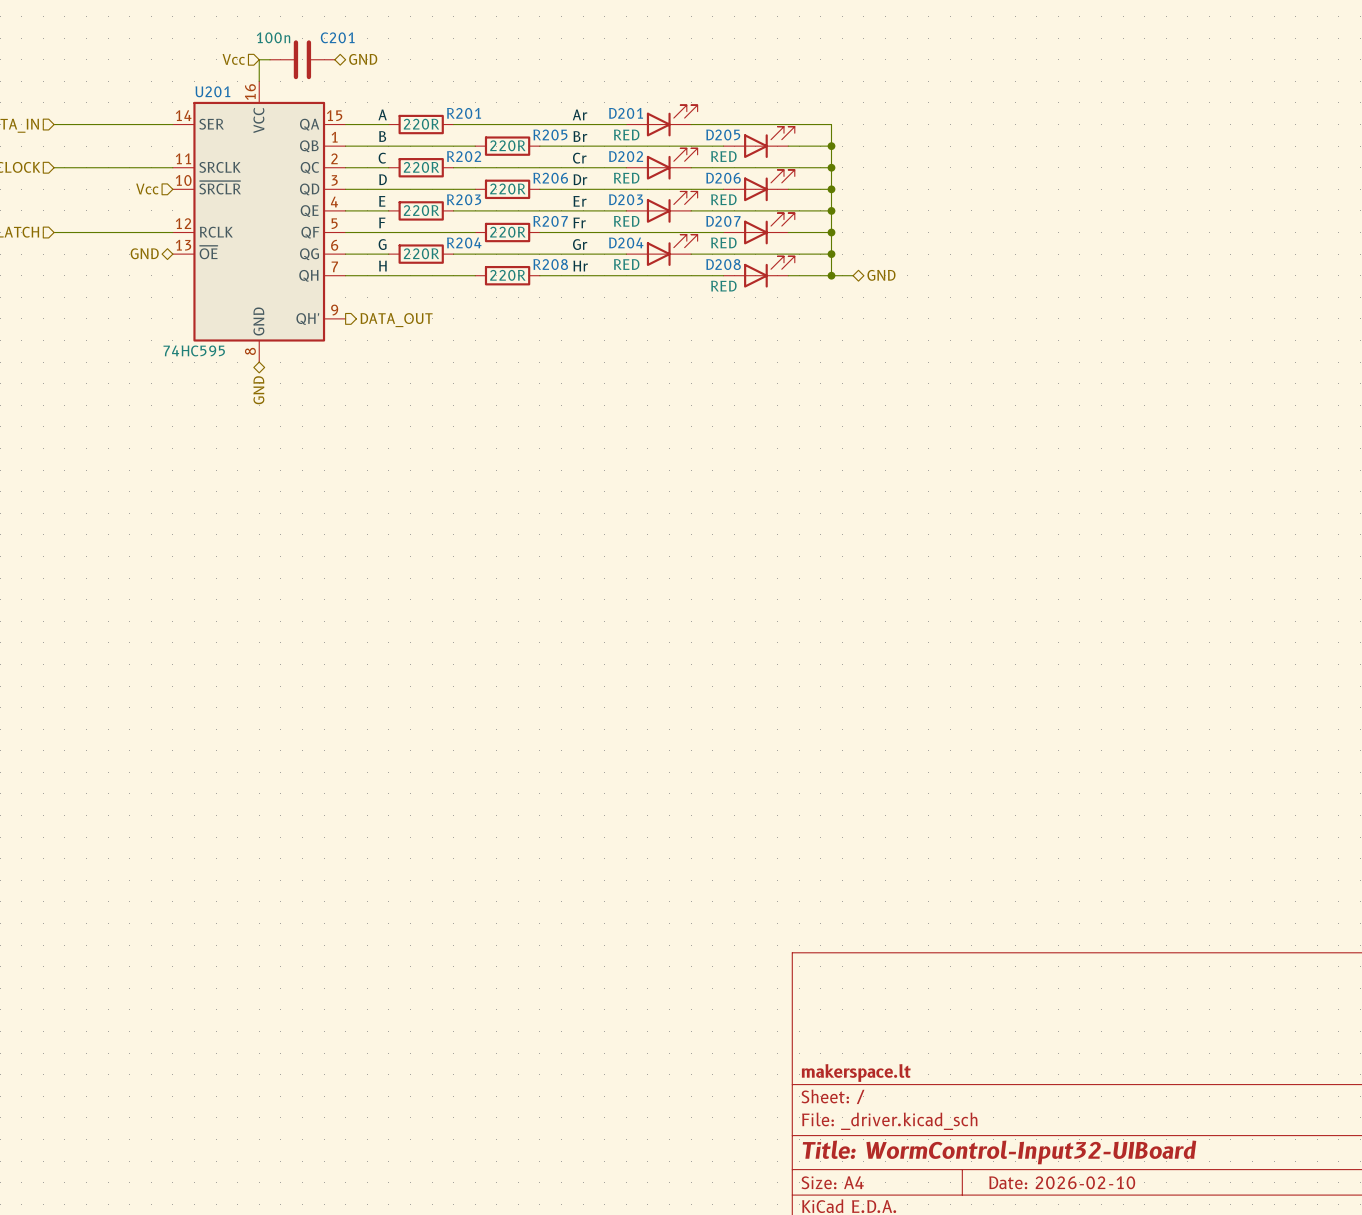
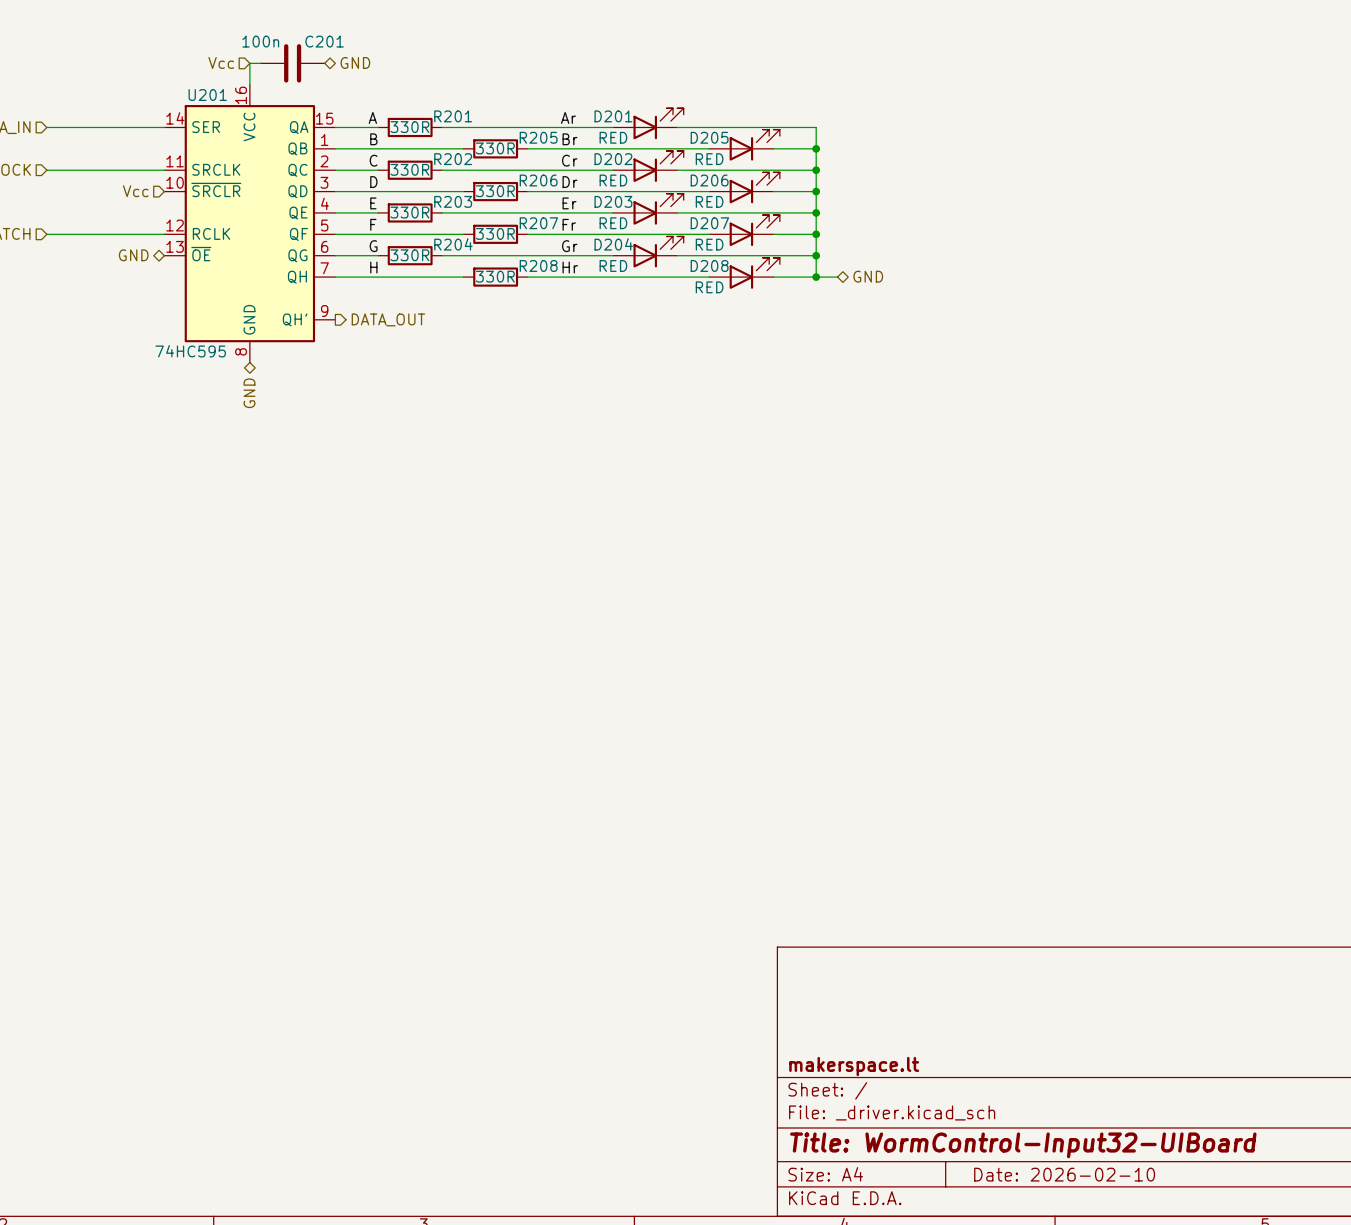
R201 value: 220R (421, 124) -> 330R (409, 127)
R205 value: 220R (507, 145) -> 330R (495, 148)
R202 value: 220R (421, 167) -> 330R (409, 169)
R206 value: 220R (507, 188) -> 330R (495, 191)
R203 value: 220R (421, 210) -> 330R (409, 212)
R207 value: 220R (507, 232) -> 330R (495, 233)
R204 value: 220R (421, 253) -> 330R (409, 255)
R208 value: 220R (507, 275) -> 330R (495, 276)

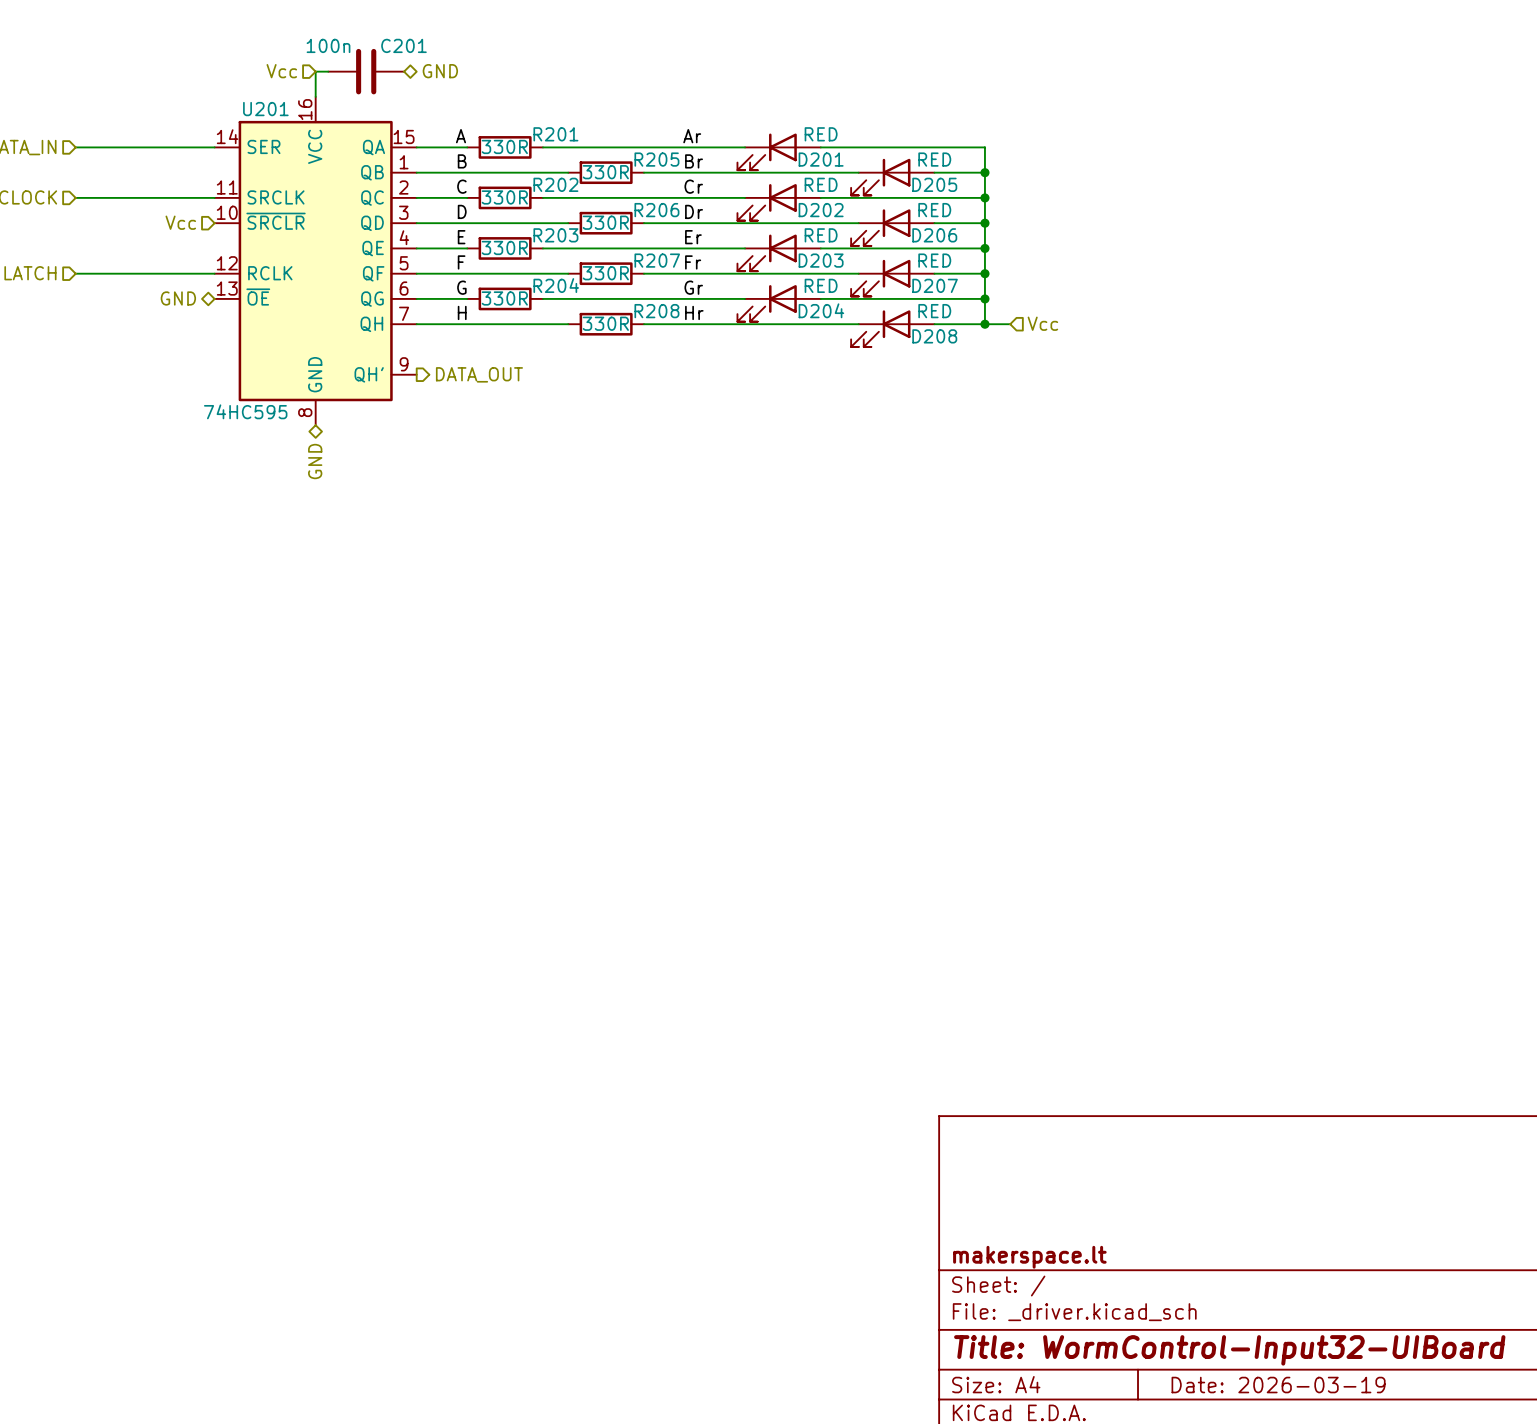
D201 rotation: 0° (658, 123) -> 180° (767, 151)
D205 rotation: 0° (754, 145) -> 180° (880, 177)
D202 rotation: 0° (658, 166) -> 180° (767, 202)
D206 rotation: 0° (754, 187) -> 180° (880, 227)
D203 rotation: 0° (658, 209) -> 180° (767, 252)
D207 rotation: 0° (754, 230) -> 180° (880, 278)
D204 rotation: 0° (658, 251) -> 180° (767, 303)
D208 rotation: 0° (754, 273) -> 180° (880, 328)
hierarchical label shape: bidirectional (868, 276) -> input (1042, 323)
hierarchical label: GND (868, 276) -> Vcc (1042, 323)
title block: Date: 2026-02-10 (1064, 1174) -> Date: 2026-03-19 (1278, 1385)

